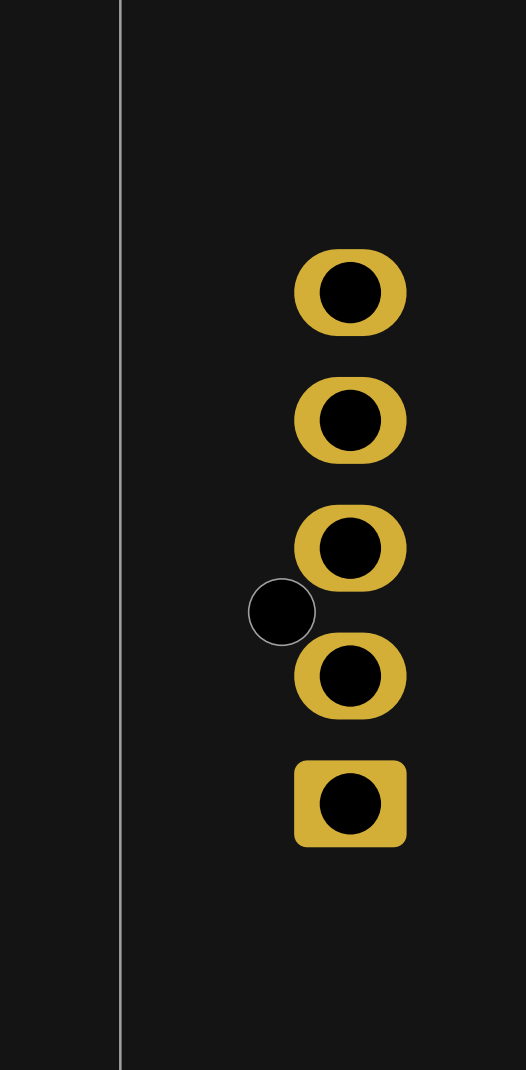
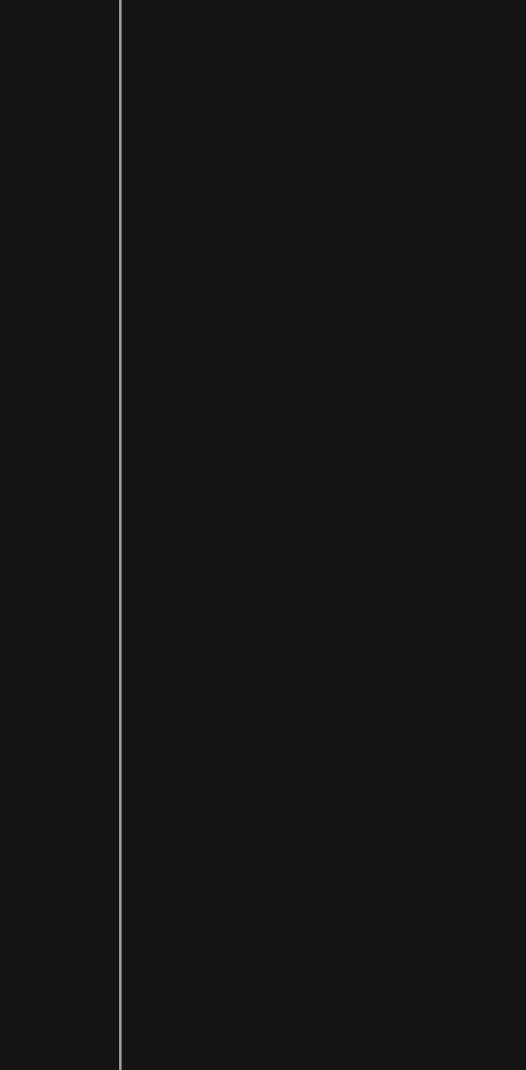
part: (327, 548) -> none

